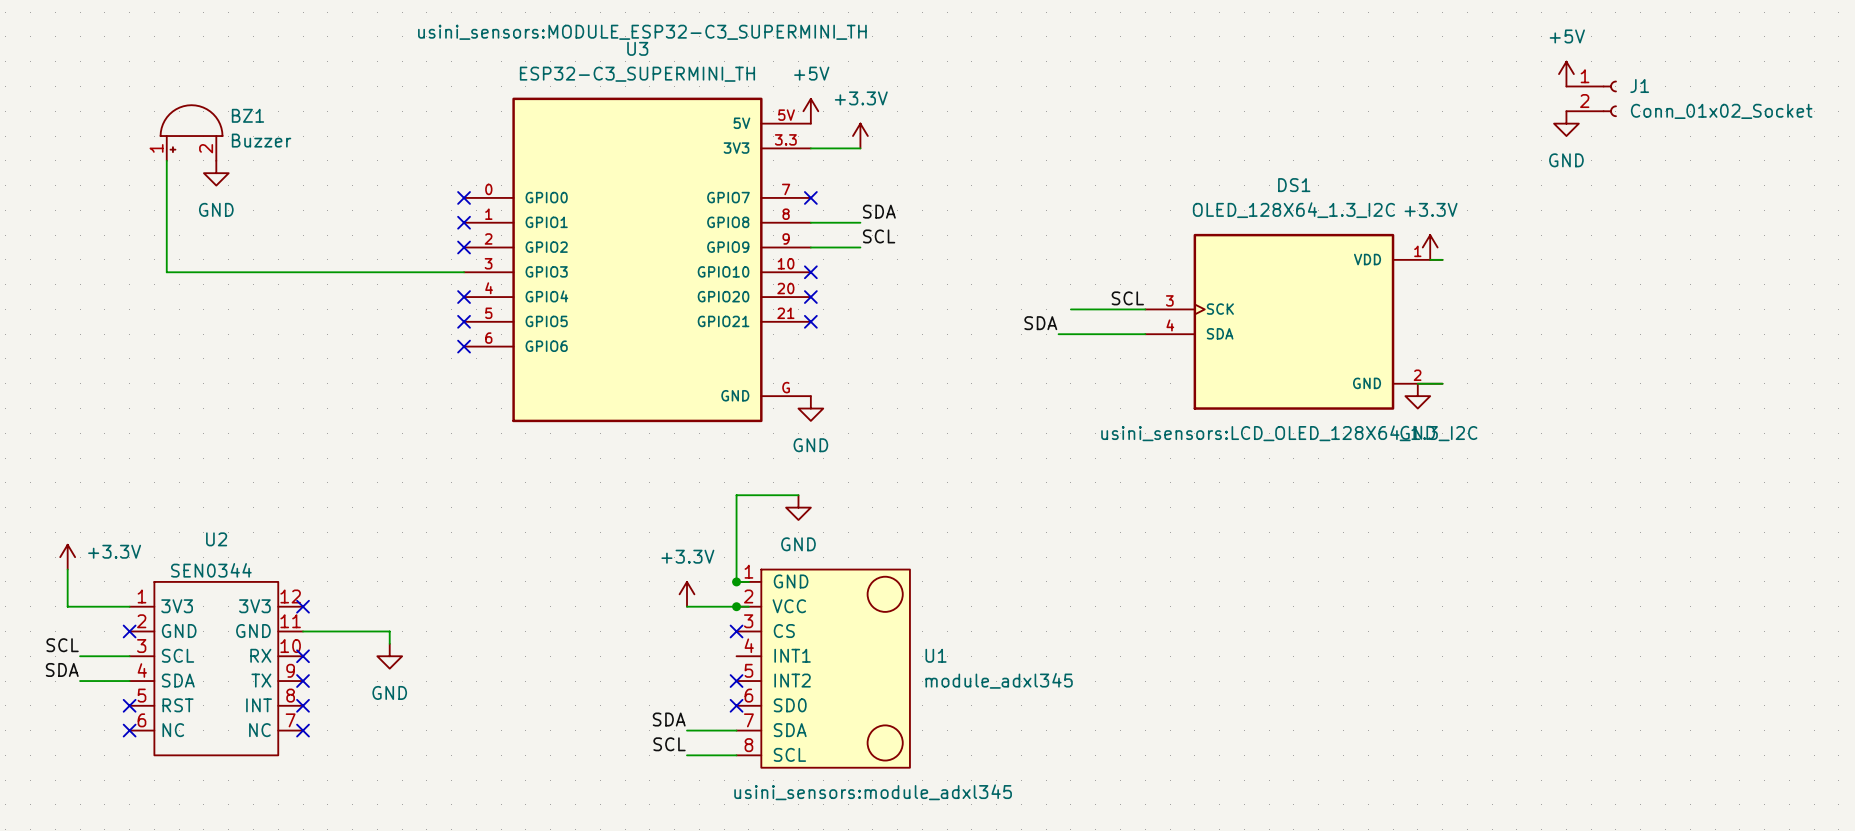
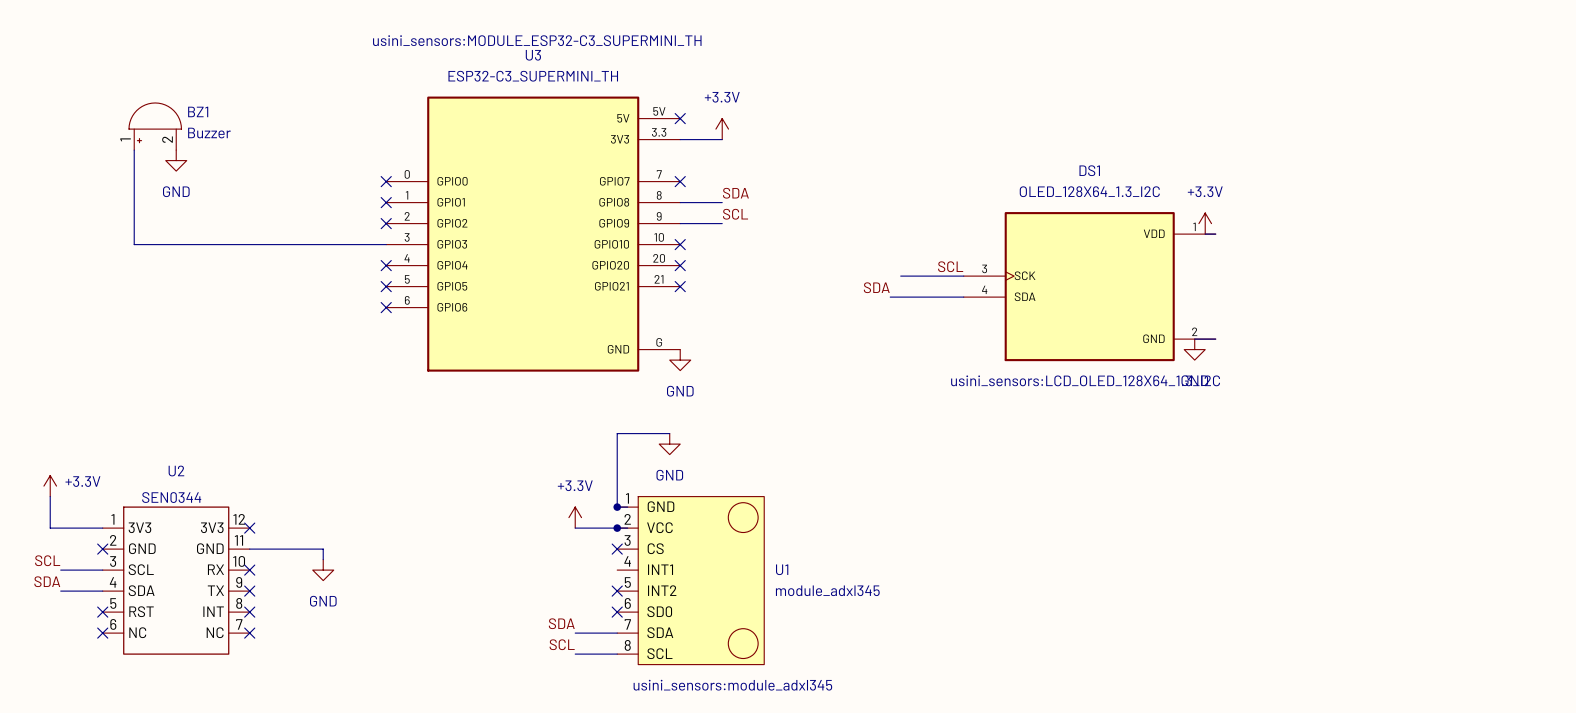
power symbol: +5V (1566, 74) -> none
J1: Conn_01x02_Socket (1591, 98) -> none
power symbol: +5V (810, 111) -> none
no-connect mark: none -> (680, 118)
power symbol: GND (1566, 123) -> none

